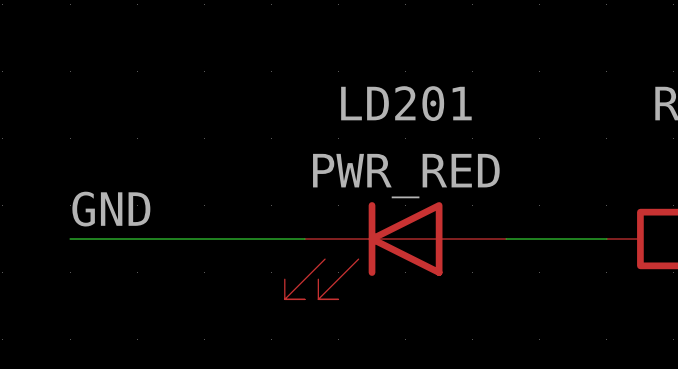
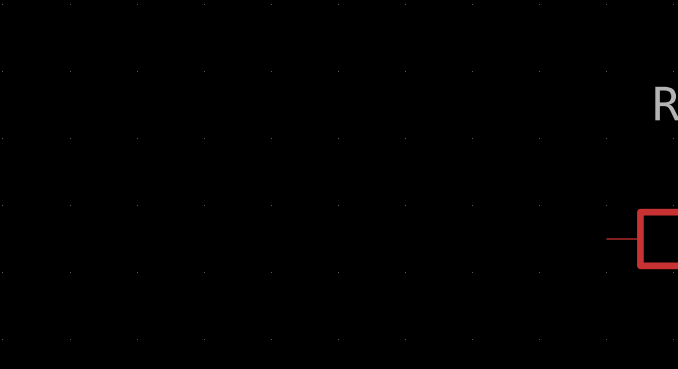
label: GND (111, 209) -> none
wire: (70, 239) (304, 239) -> none
wire: (506, 239) (606, 239) -> none
LD201: PWR_RED (395, 250) -> none

